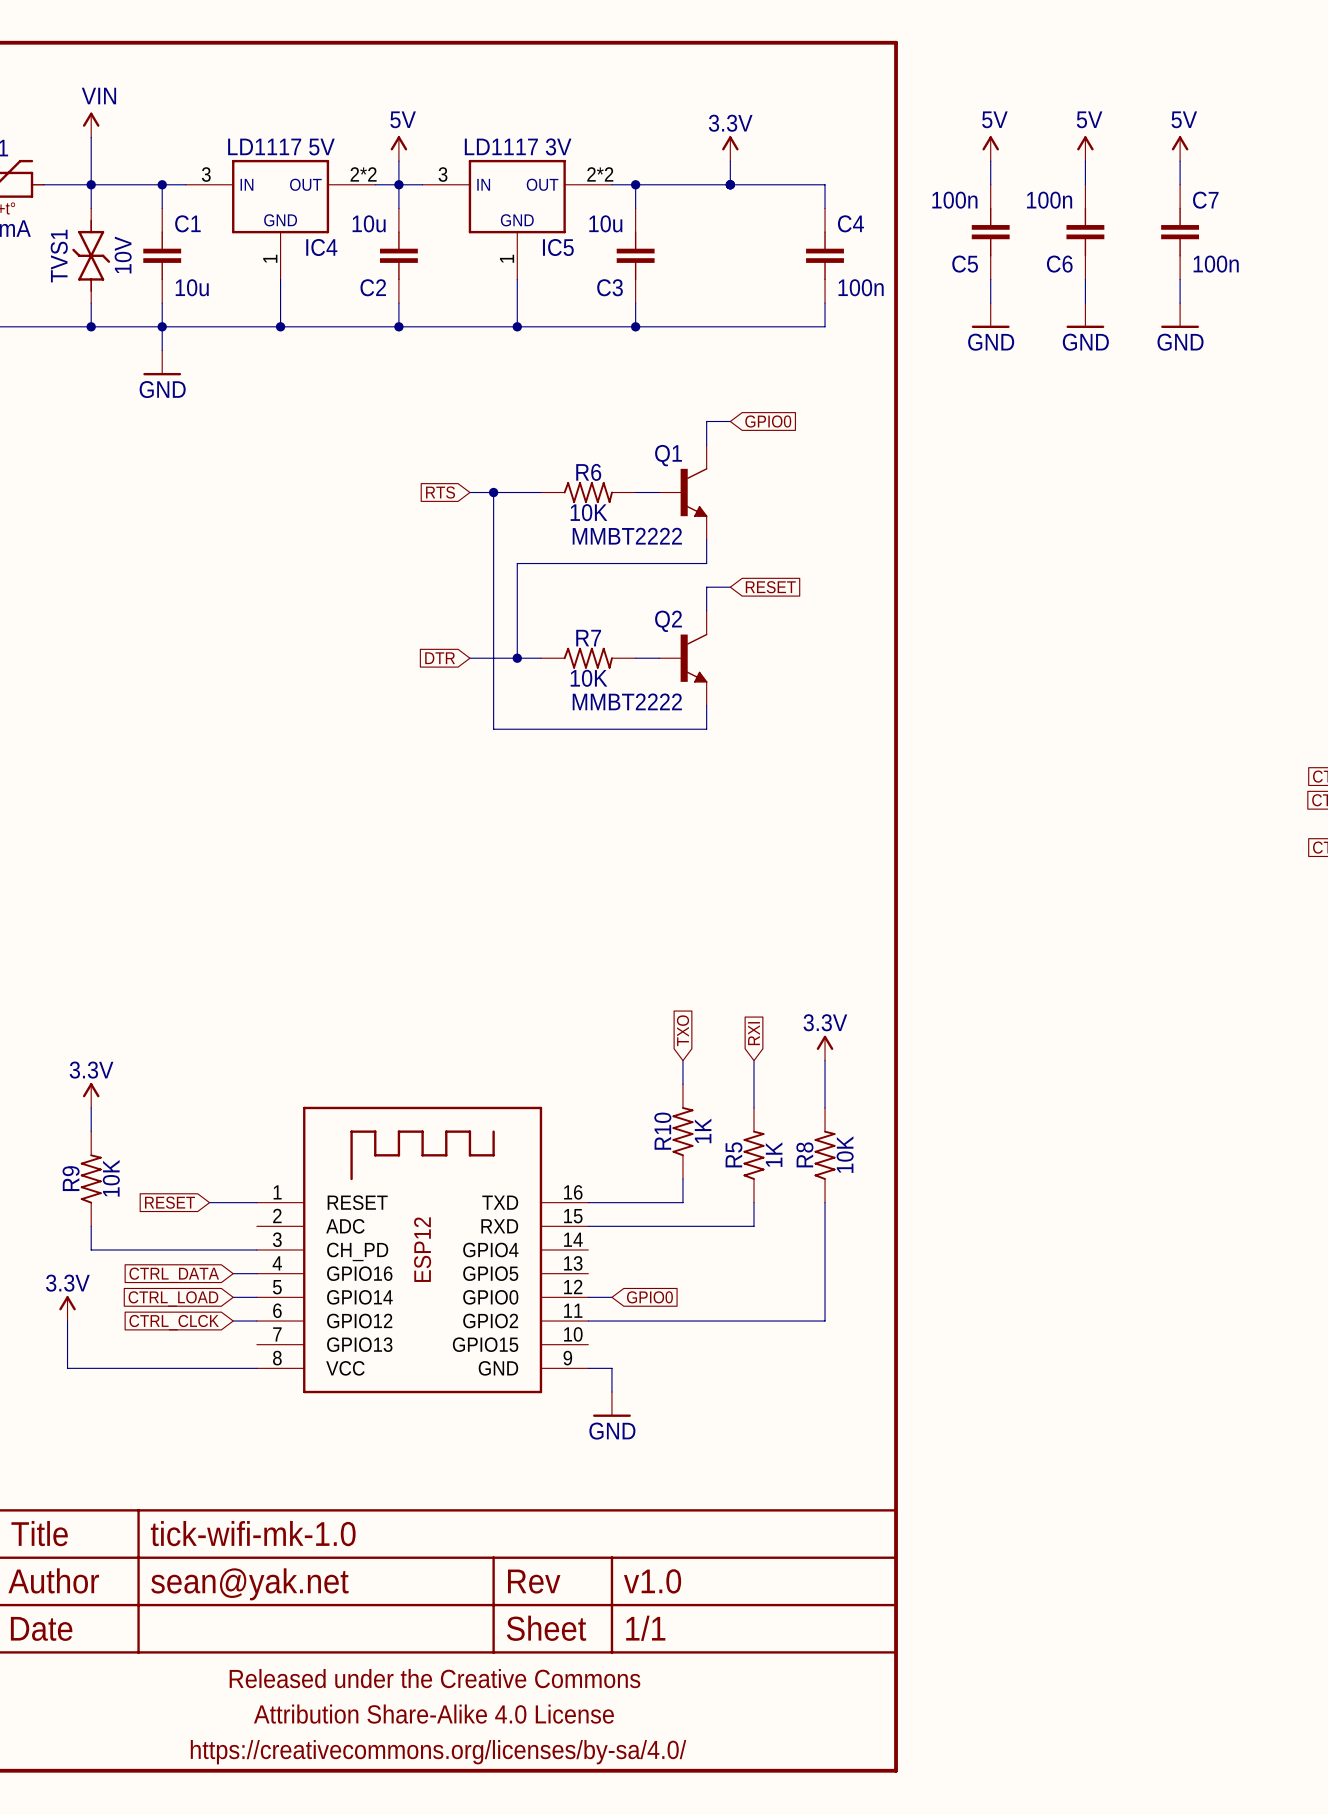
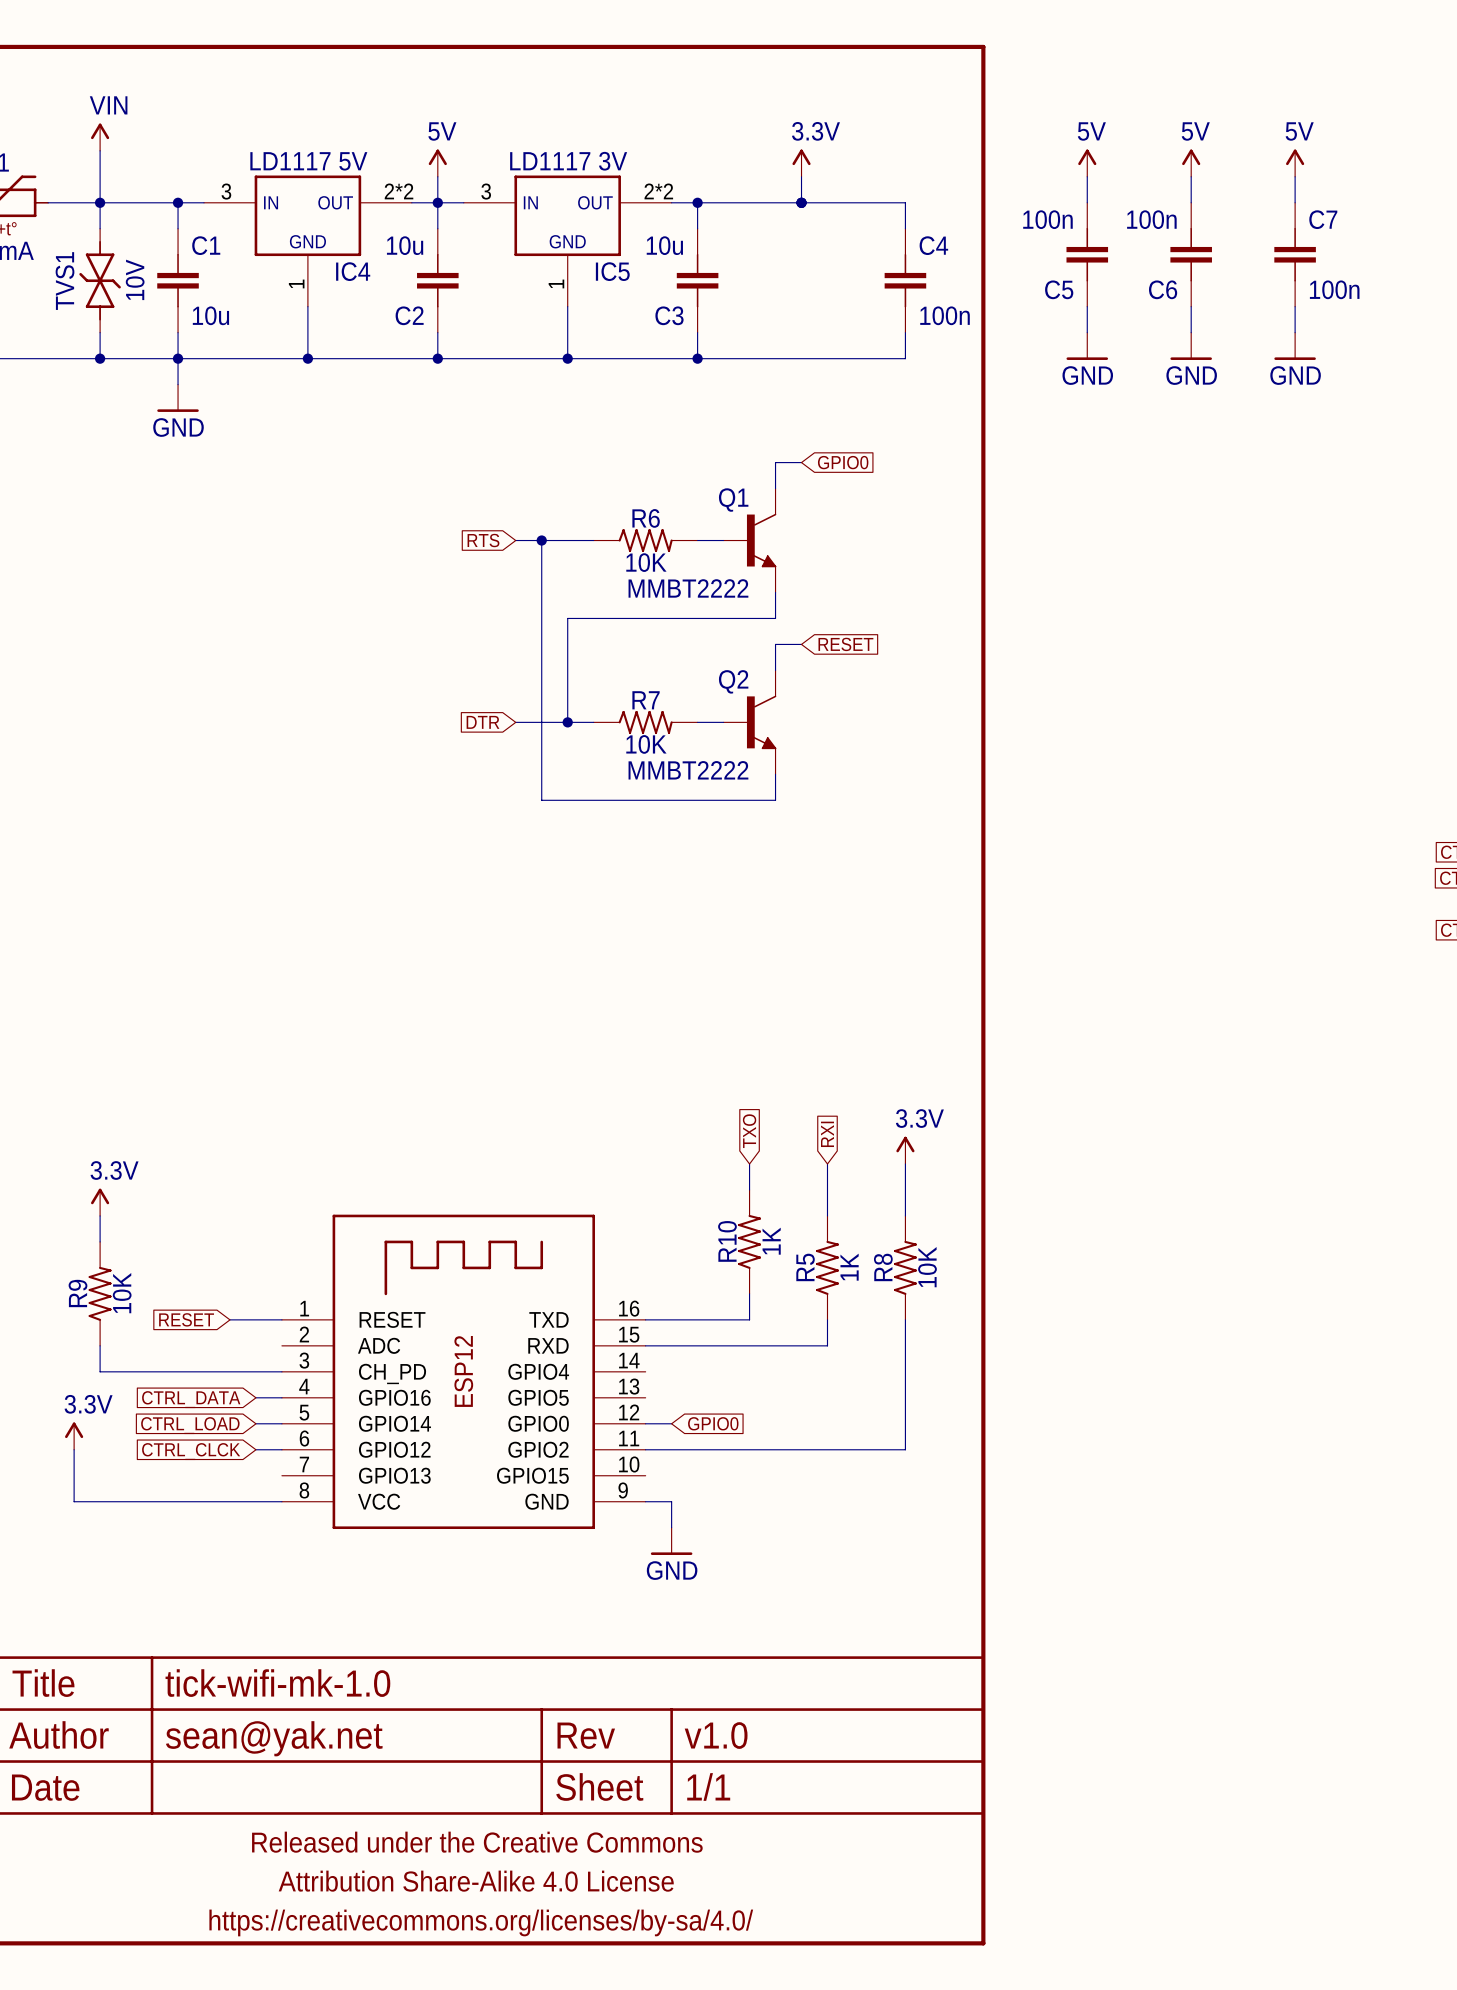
power symbol text position: 3.3V (730, 123) -> 3.3V (815, 131)
power symbol text position: 3.3V (825, 1022) -> 3.3V (919, 1118)
power symbol text position: 3.3V (91, 1070) -> 3.3V (114, 1170)
power symbol text position: 3.3V (67, 1283) -> 3.3V (88, 1404)

